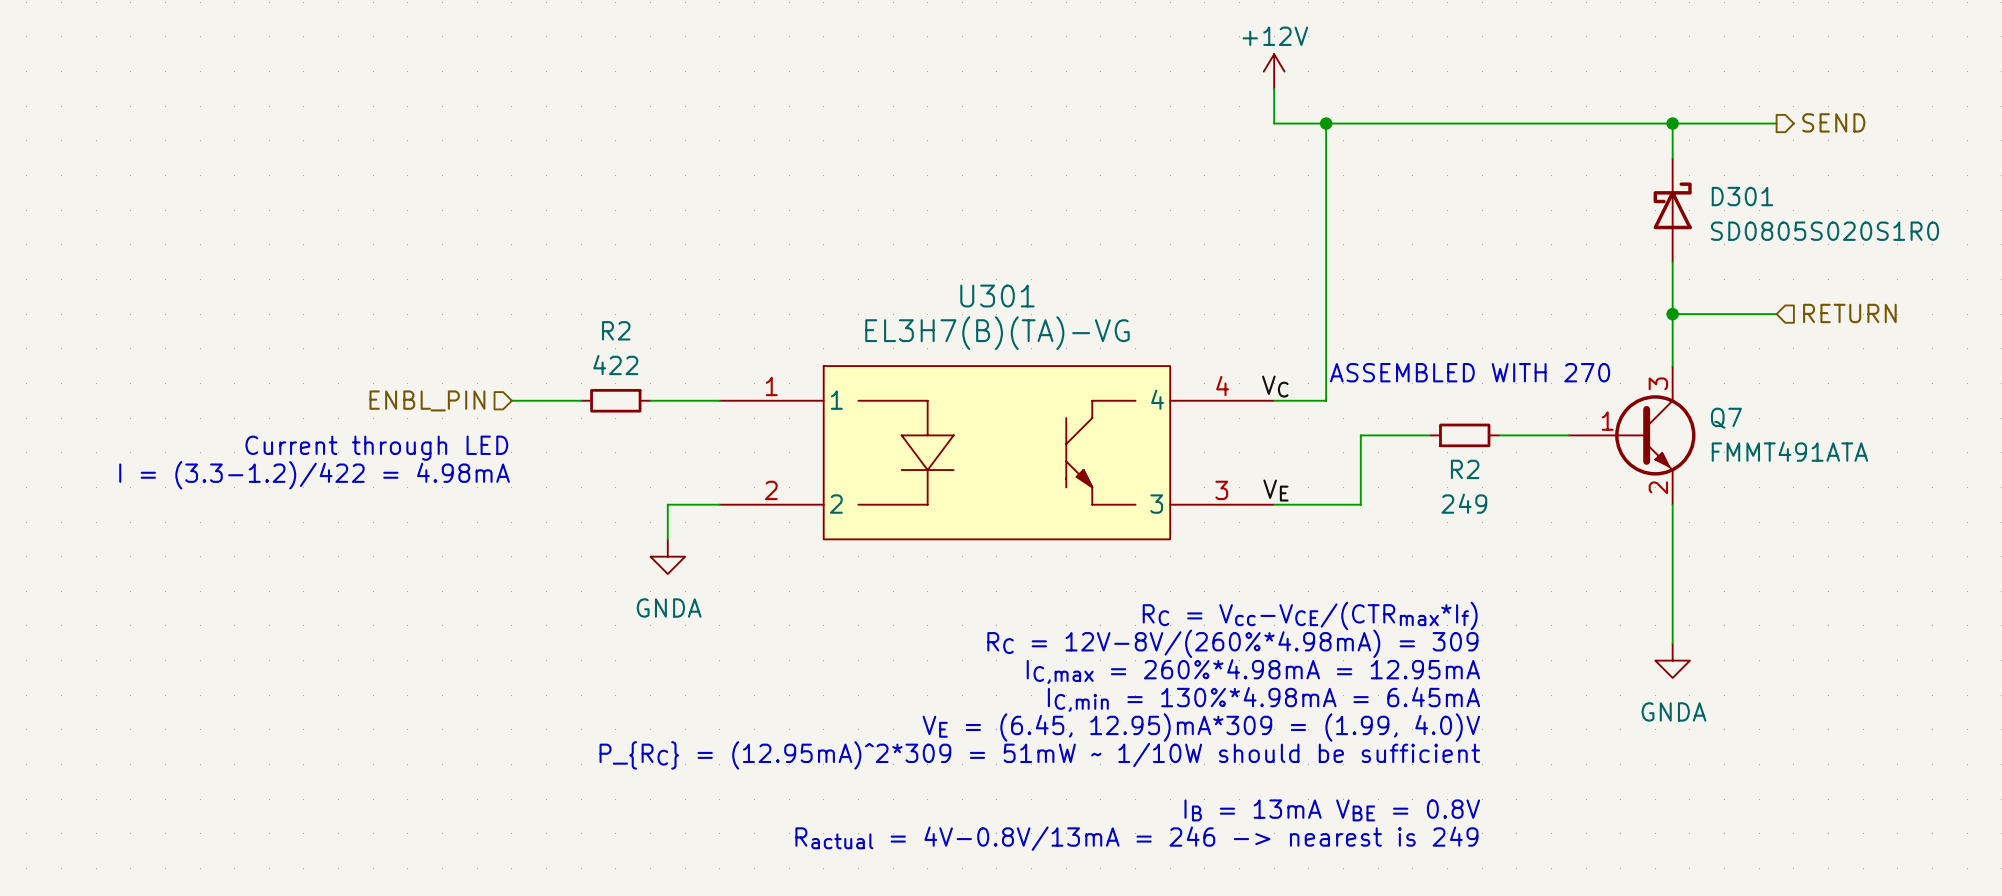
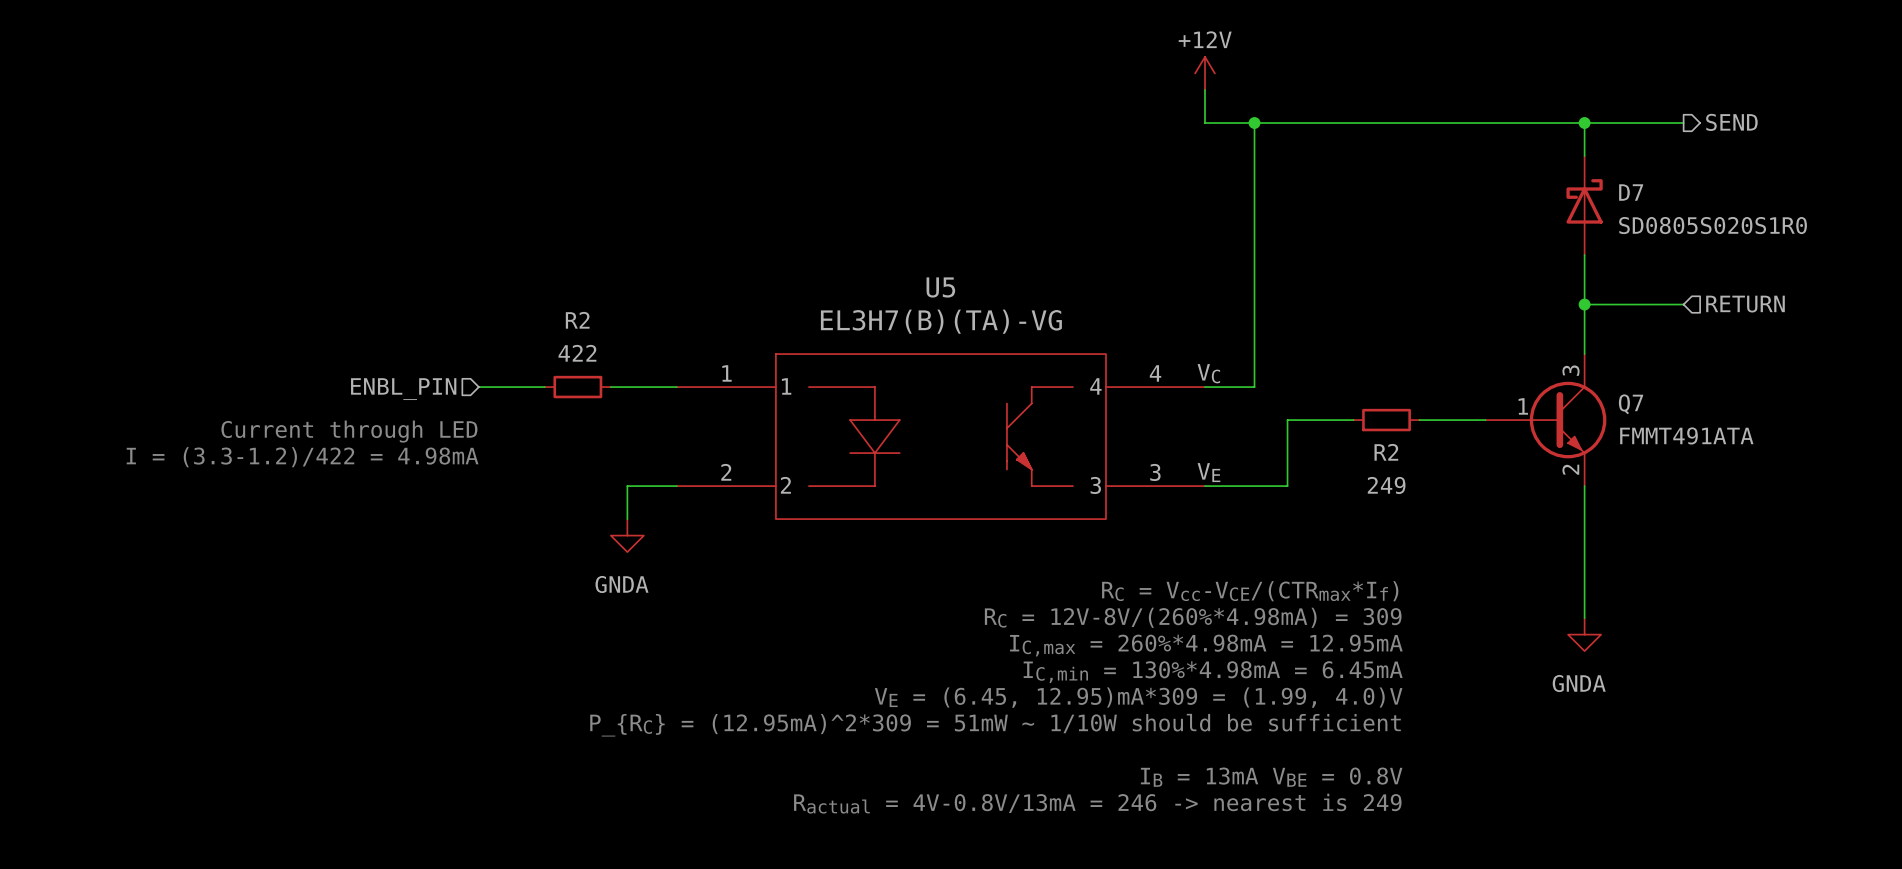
D301 name: D301 (1742, 196) -> D7 (1631, 192)
U301 name: U301 (997, 296) -> U5 (940, 287)
text: ASSEMBLED WITH 270 (1470, 372) -> none

